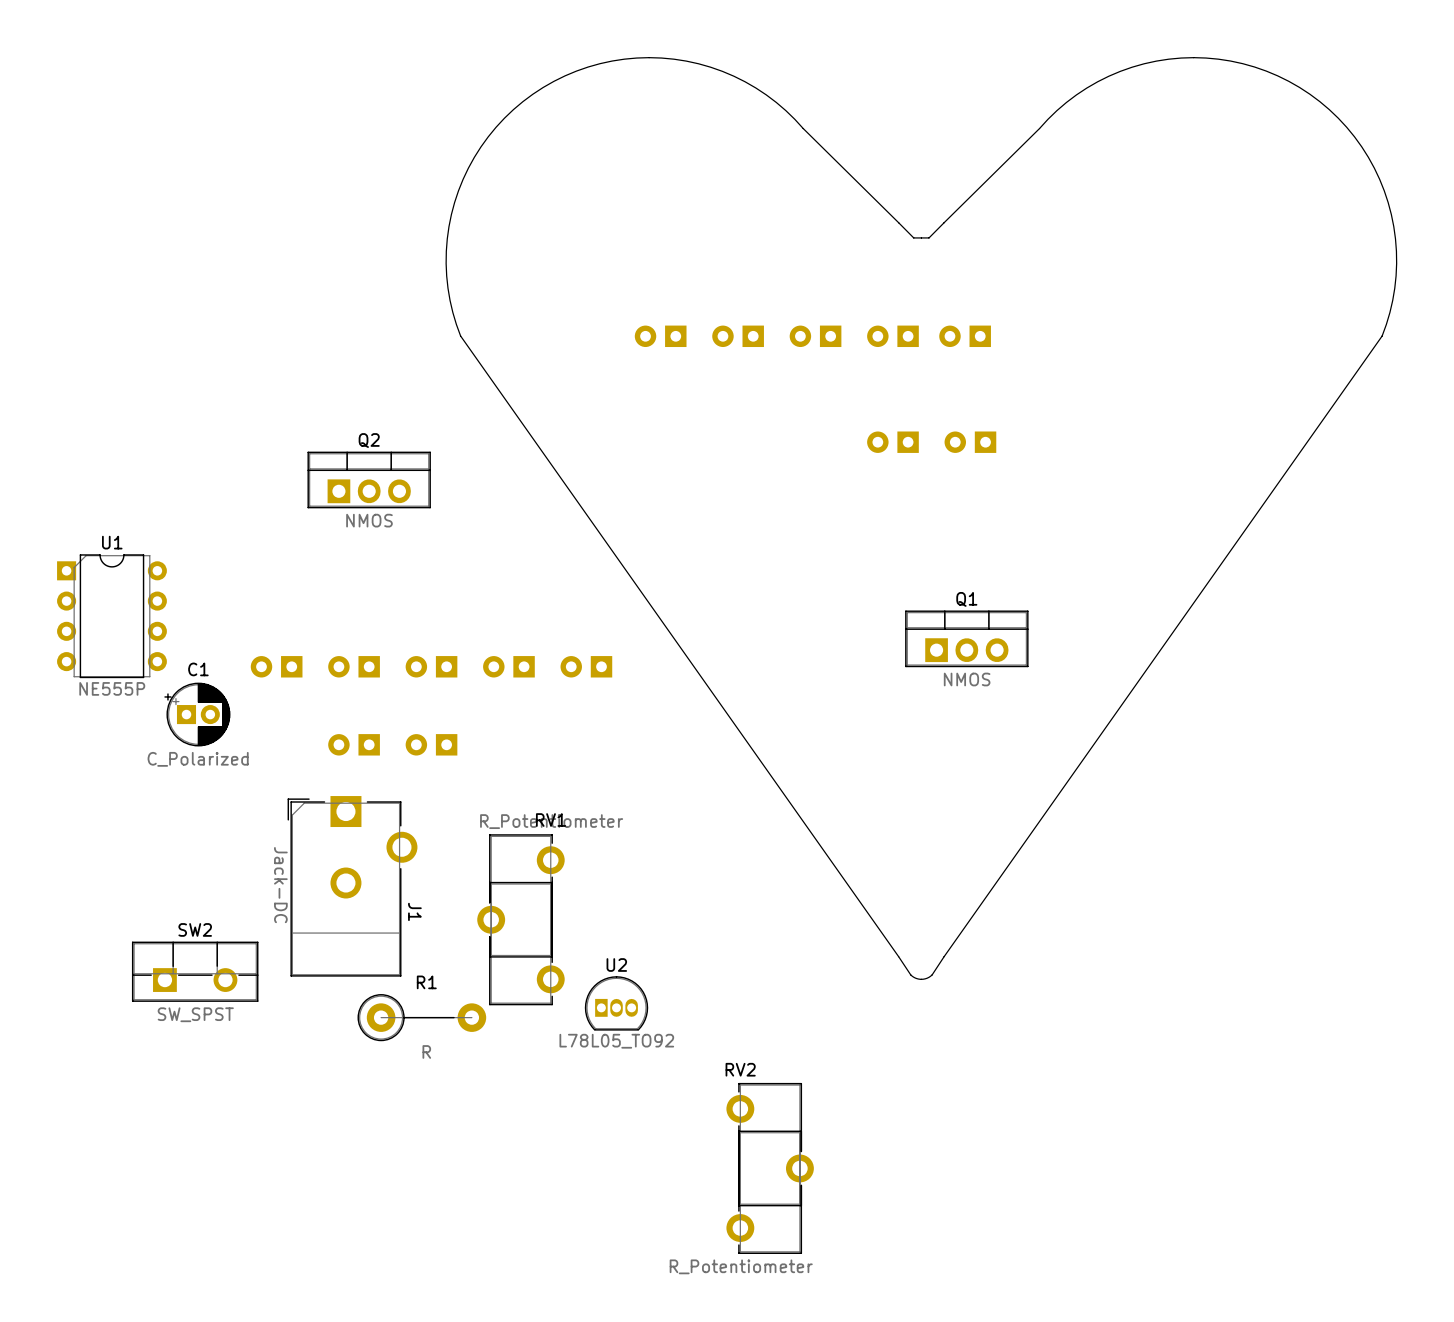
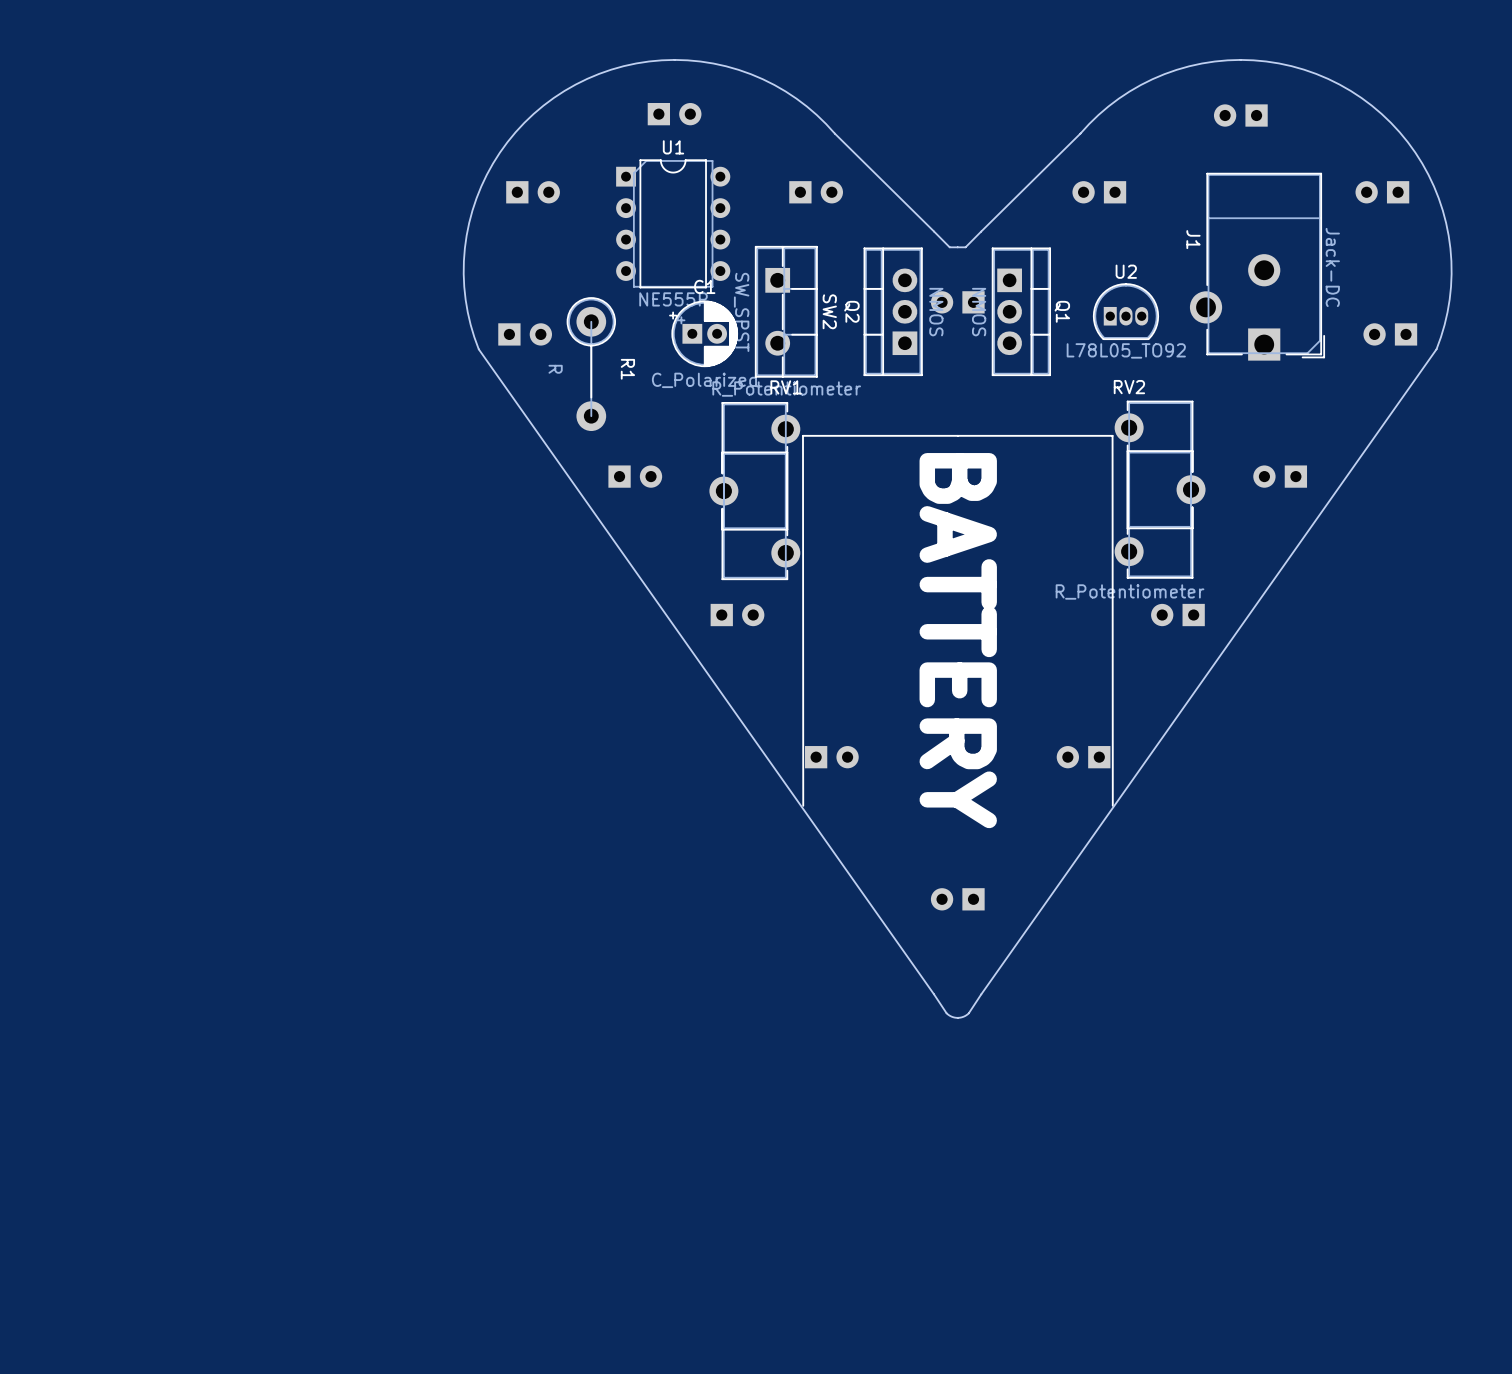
part: none -> (674, 114)
part: none -> (1240, 115)
part: none -> (533, 192)
part: none -> (816, 192)
part: none -> (1099, 192)
part: none -> (1382, 192)
part: none -> (957, 302)
part: none -> (525, 334)
part: none -> (1390, 334)
part: (660, 336) -> none
part: (738, 336) -> none
part: (815, 336) -> none
part: (892, 336) -> none
part: (965, 336) -> none
part: (892, 442) -> none
part: (970, 442) -> none
part: none -> (635, 476)
part: none -> (1280, 476)
Q2 rotation: 0° (369, 479) -> 90° counterclockwise (893, 311)
Q2 position: (369, 479) -> (893, 311)
part: none -> (737, 615)
part: none -> (1177, 615)
U1 position: (111, 616) -> (673, 223)
text: none -> BATTERY (958, 640)
Q1 rotation: 0° (966, 638) -> 90° clockwise (1021, 311)
Q1 position: (966, 638) -> (1021, 311)
part: (276, 666) -> none
part: (354, 666) -> none
part: (431, 666) -> none
part: (508, 666) -> none
part: (586, 666) -> none
C1 position: (197, 714) -> (703, 333)
part: none -> (831, 757)
part: none -> (1083, 757)
part: (354, 744) -> none
part: (431, 744) -> none
line: none -> (1112, 805) (1112, 435) (803, 435) (803, 805)
RV1 footprint: [477, 834, 565, 1006] -> [709, 402, 801, 580]
part: none -> (957, 899)
J1 rotation: 0° (352, 886) -> 180° (1257, 266)
J1 position: (352, 886) -> (1257, 266)
SW2 rotation: 0° (195, 971) -> 90° clockwise (786, 311)
SW2 position: (195, 971) -> (786, 311)
U2 position: (616, 1003) -> (1125, 311)
R1 rotation: 0° (421, 1017) -> 90° clockwise (591, 364)
R1 position: (421, 1017) -> (591, 364)
RV2 footprint: [726, 1082, 814, 1254] -> [1114, 400, 1206, 579]

